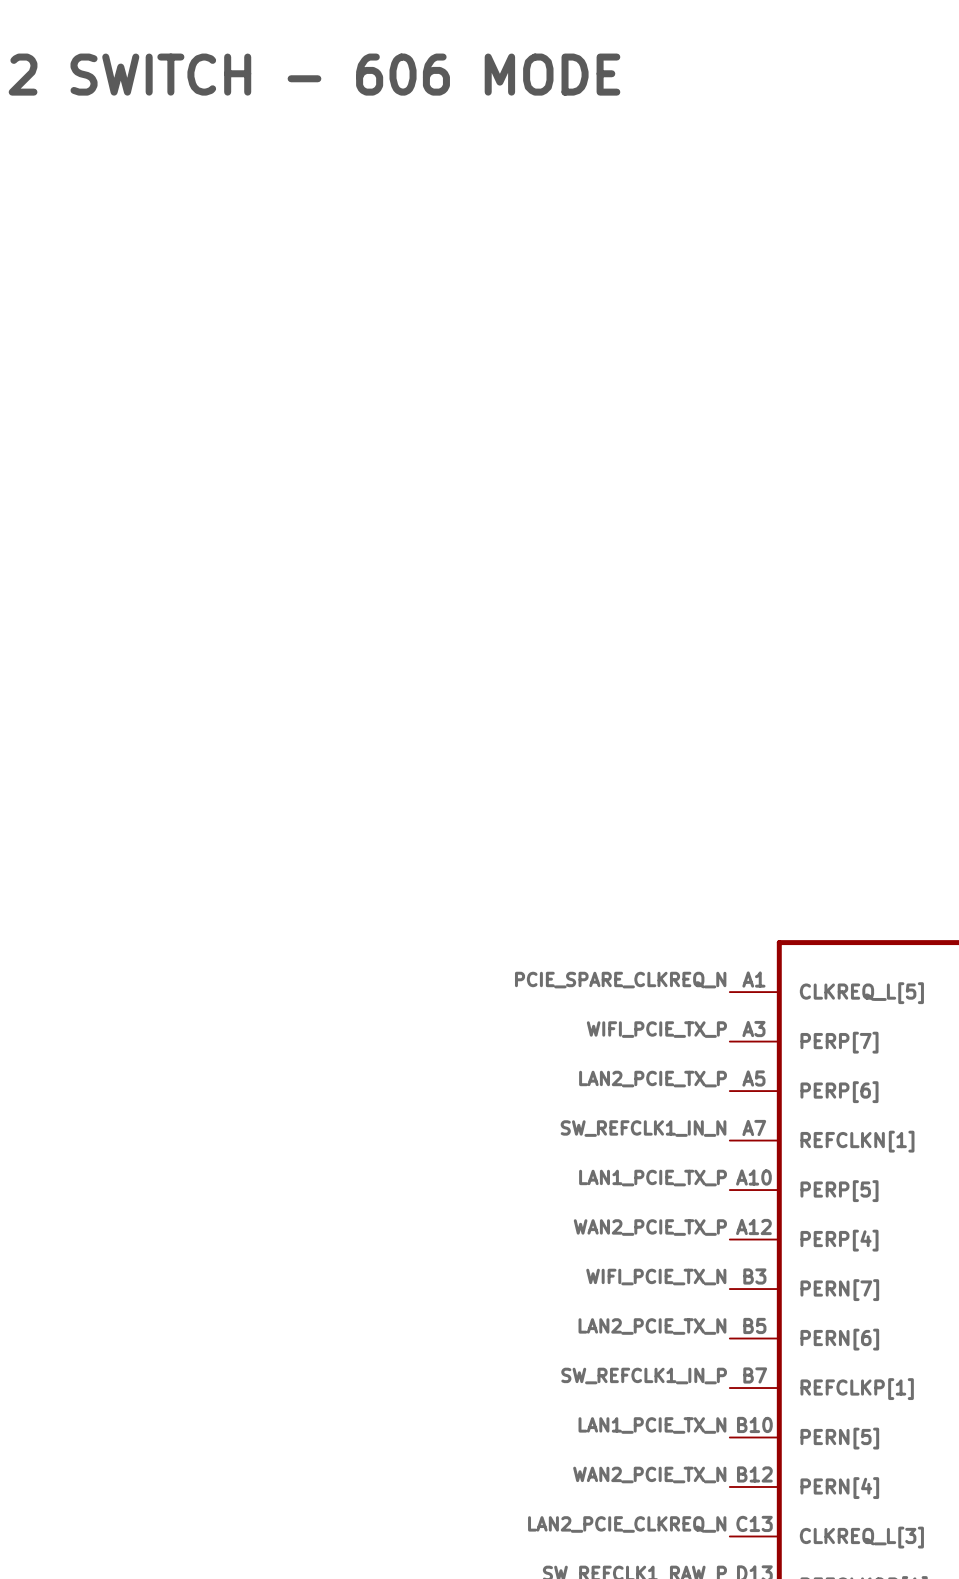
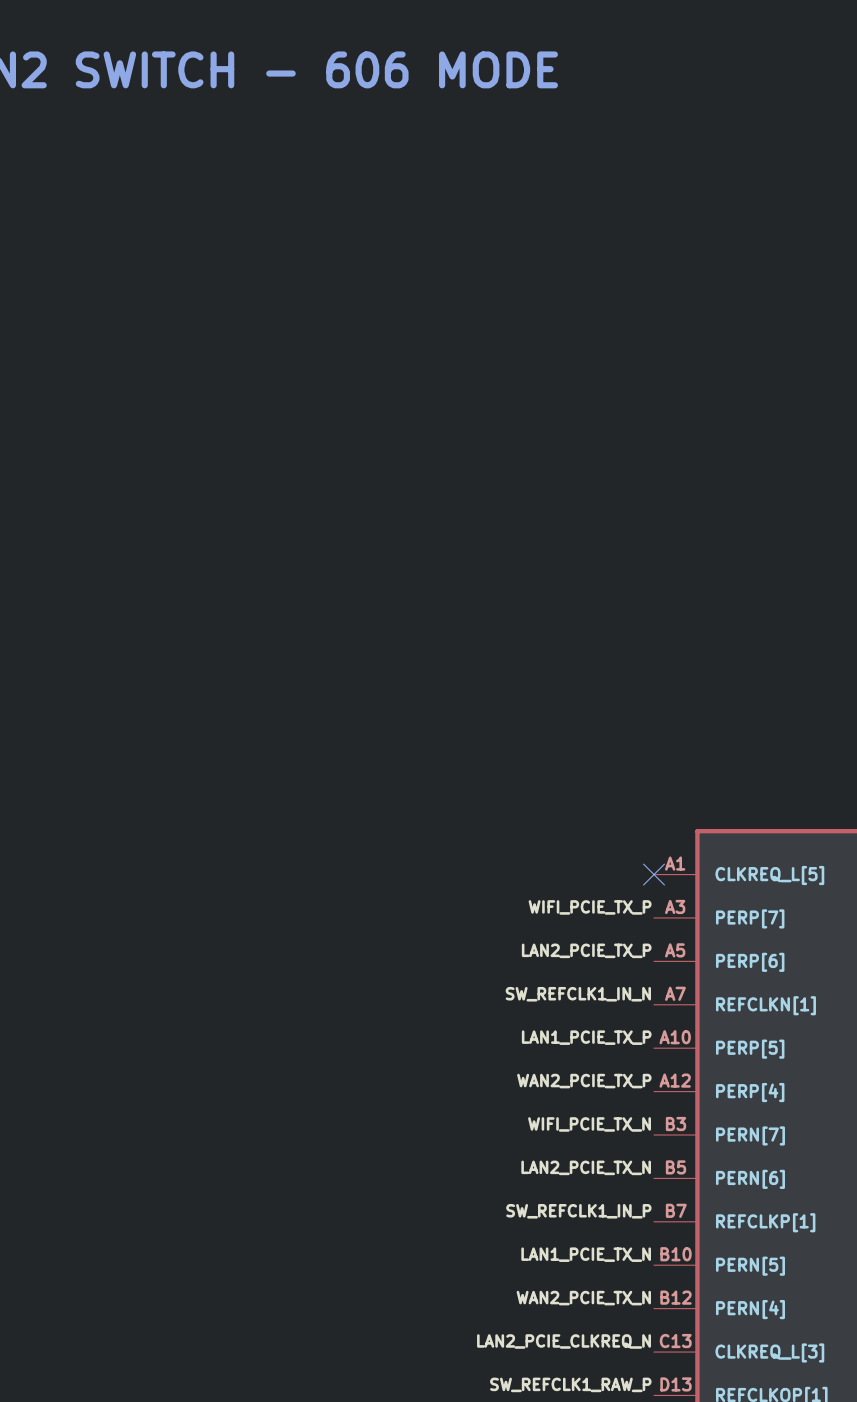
label: PCIE_SPARE_CLKREQ_N (620, 980) -> none
no-connect mark: none -> (654, 874)

